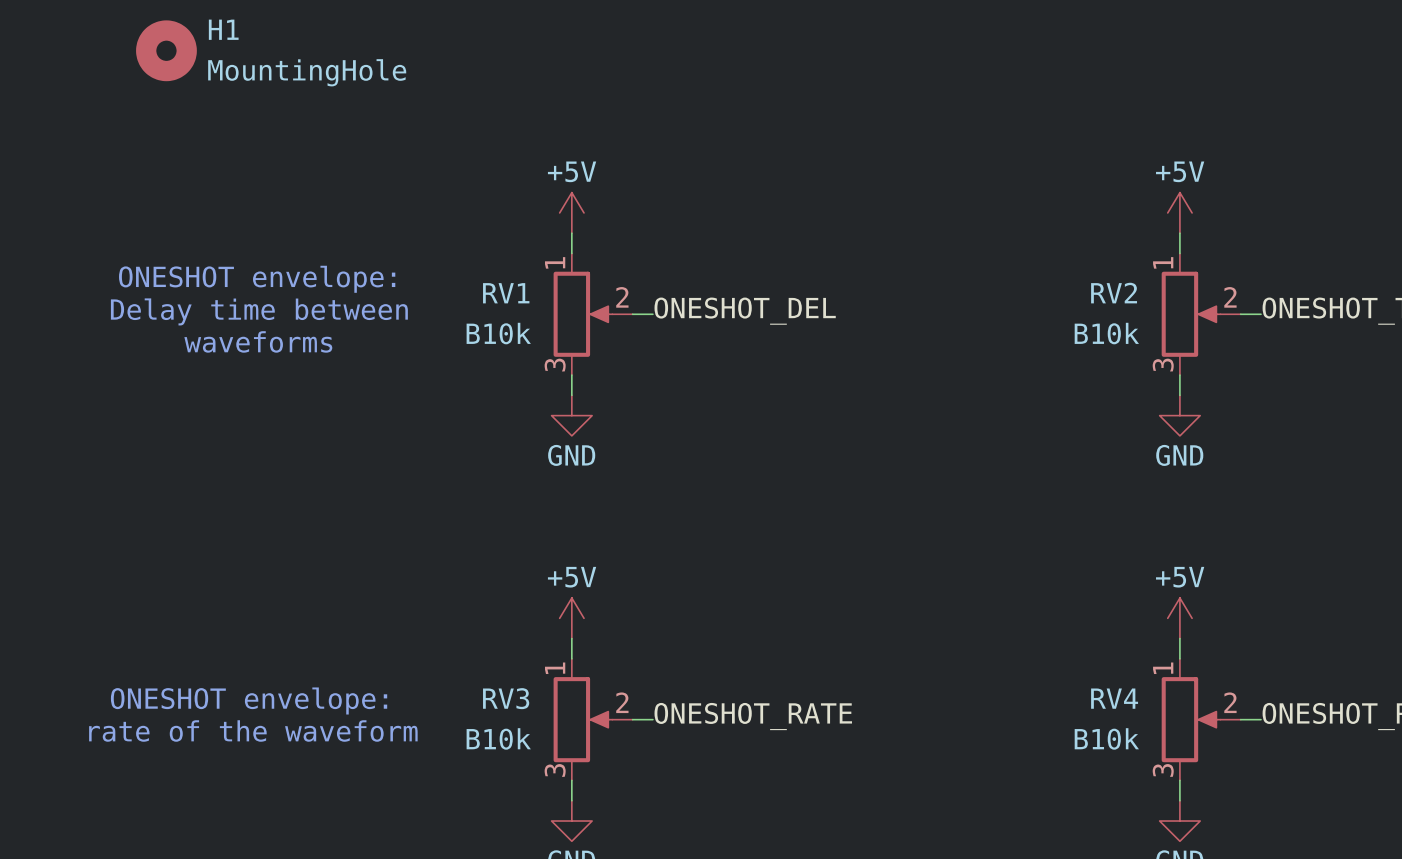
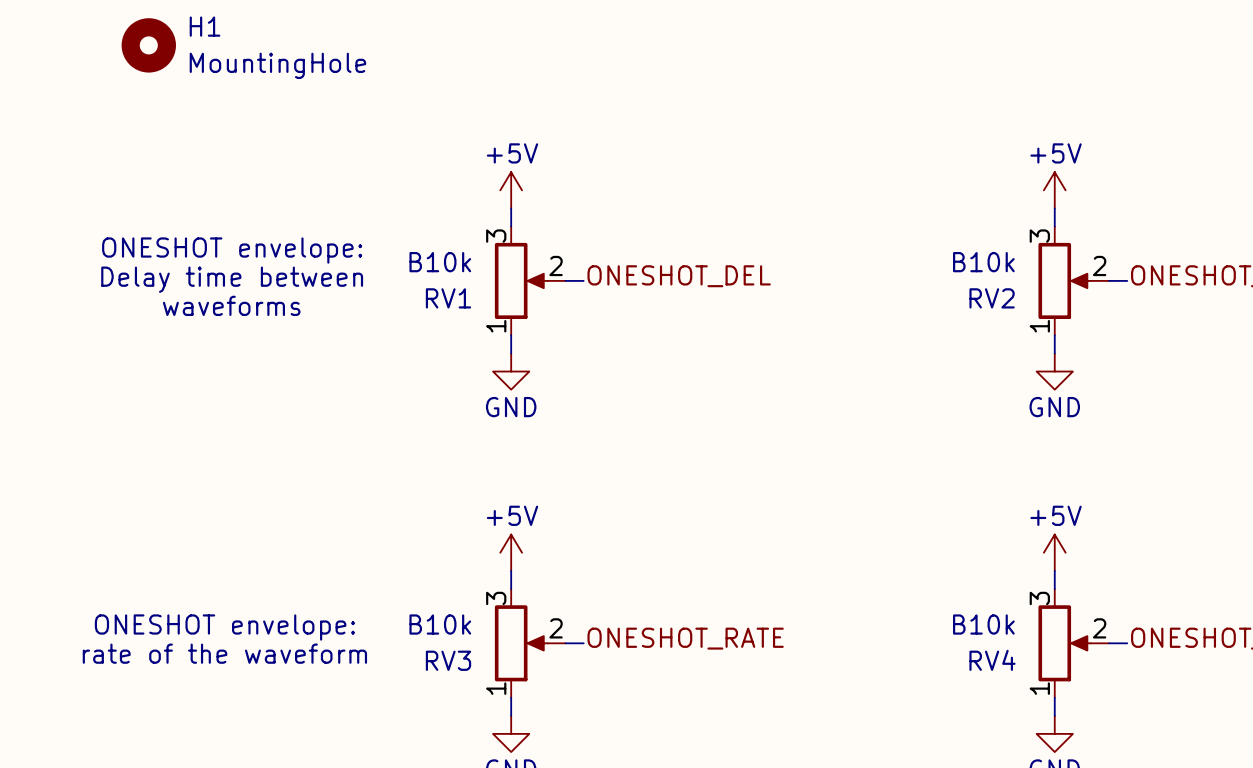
RV1 flip: as is (582, 314) -> up-down (521, 280)
RV2 flip: as is (1191, 314) -> up-down (1064, 280)
RV3 flip: as is (582, 719) -> up-down (521, 643)
RV4 flip: as is (1191, 719) -> up-down (1064, 643)

